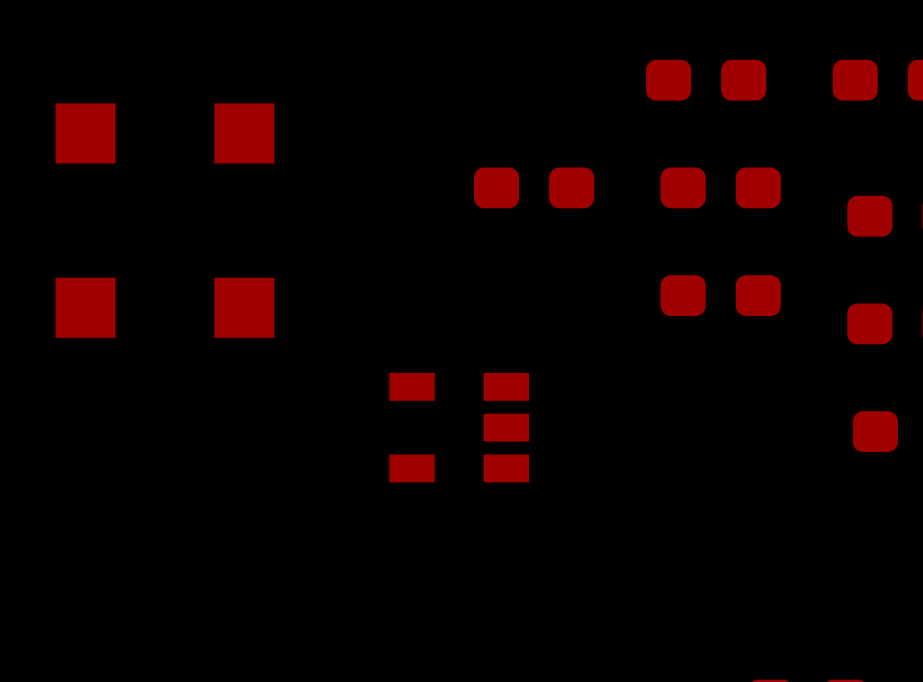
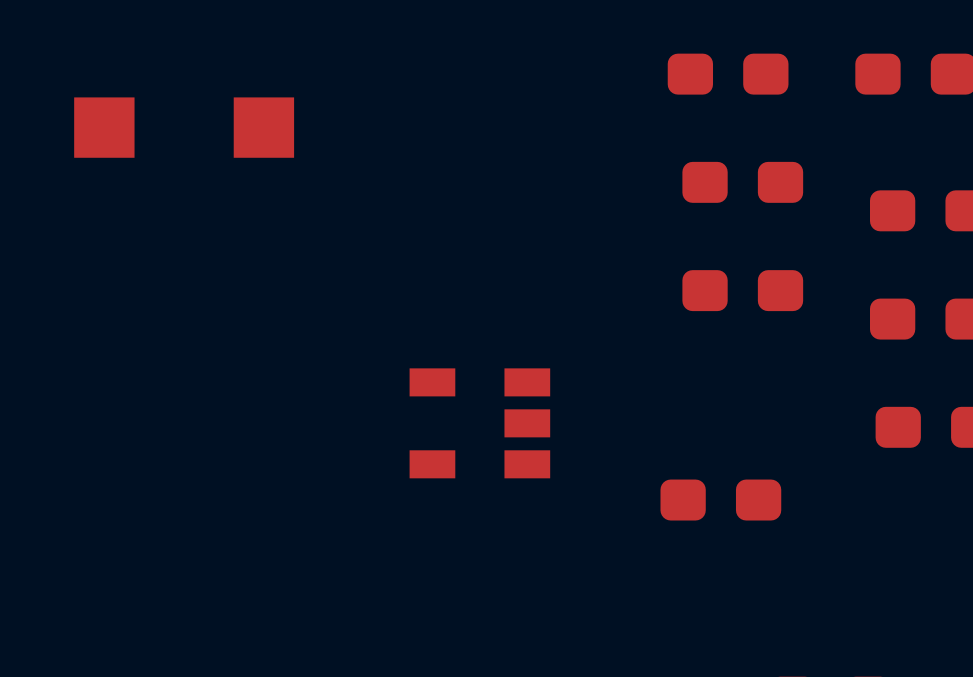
part position: (534, 187) -> (720, 500)
part: (164, 307) -> none

